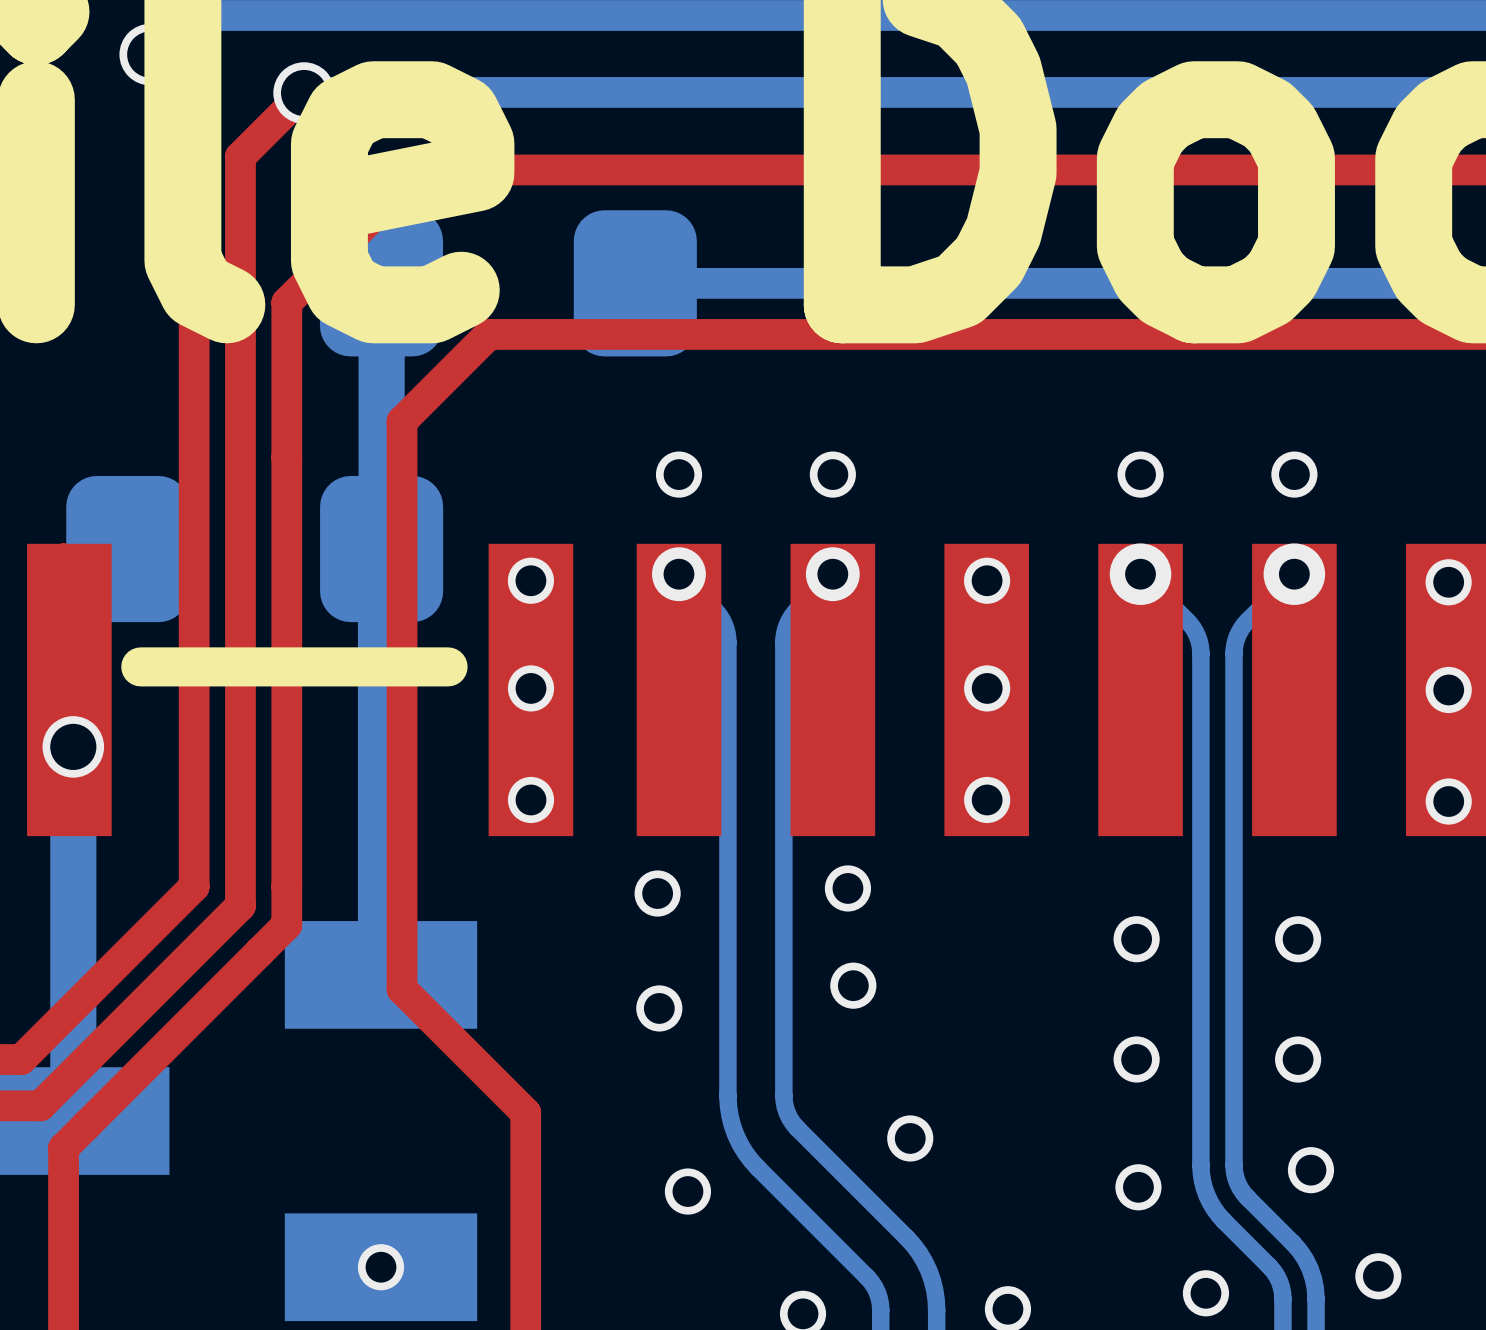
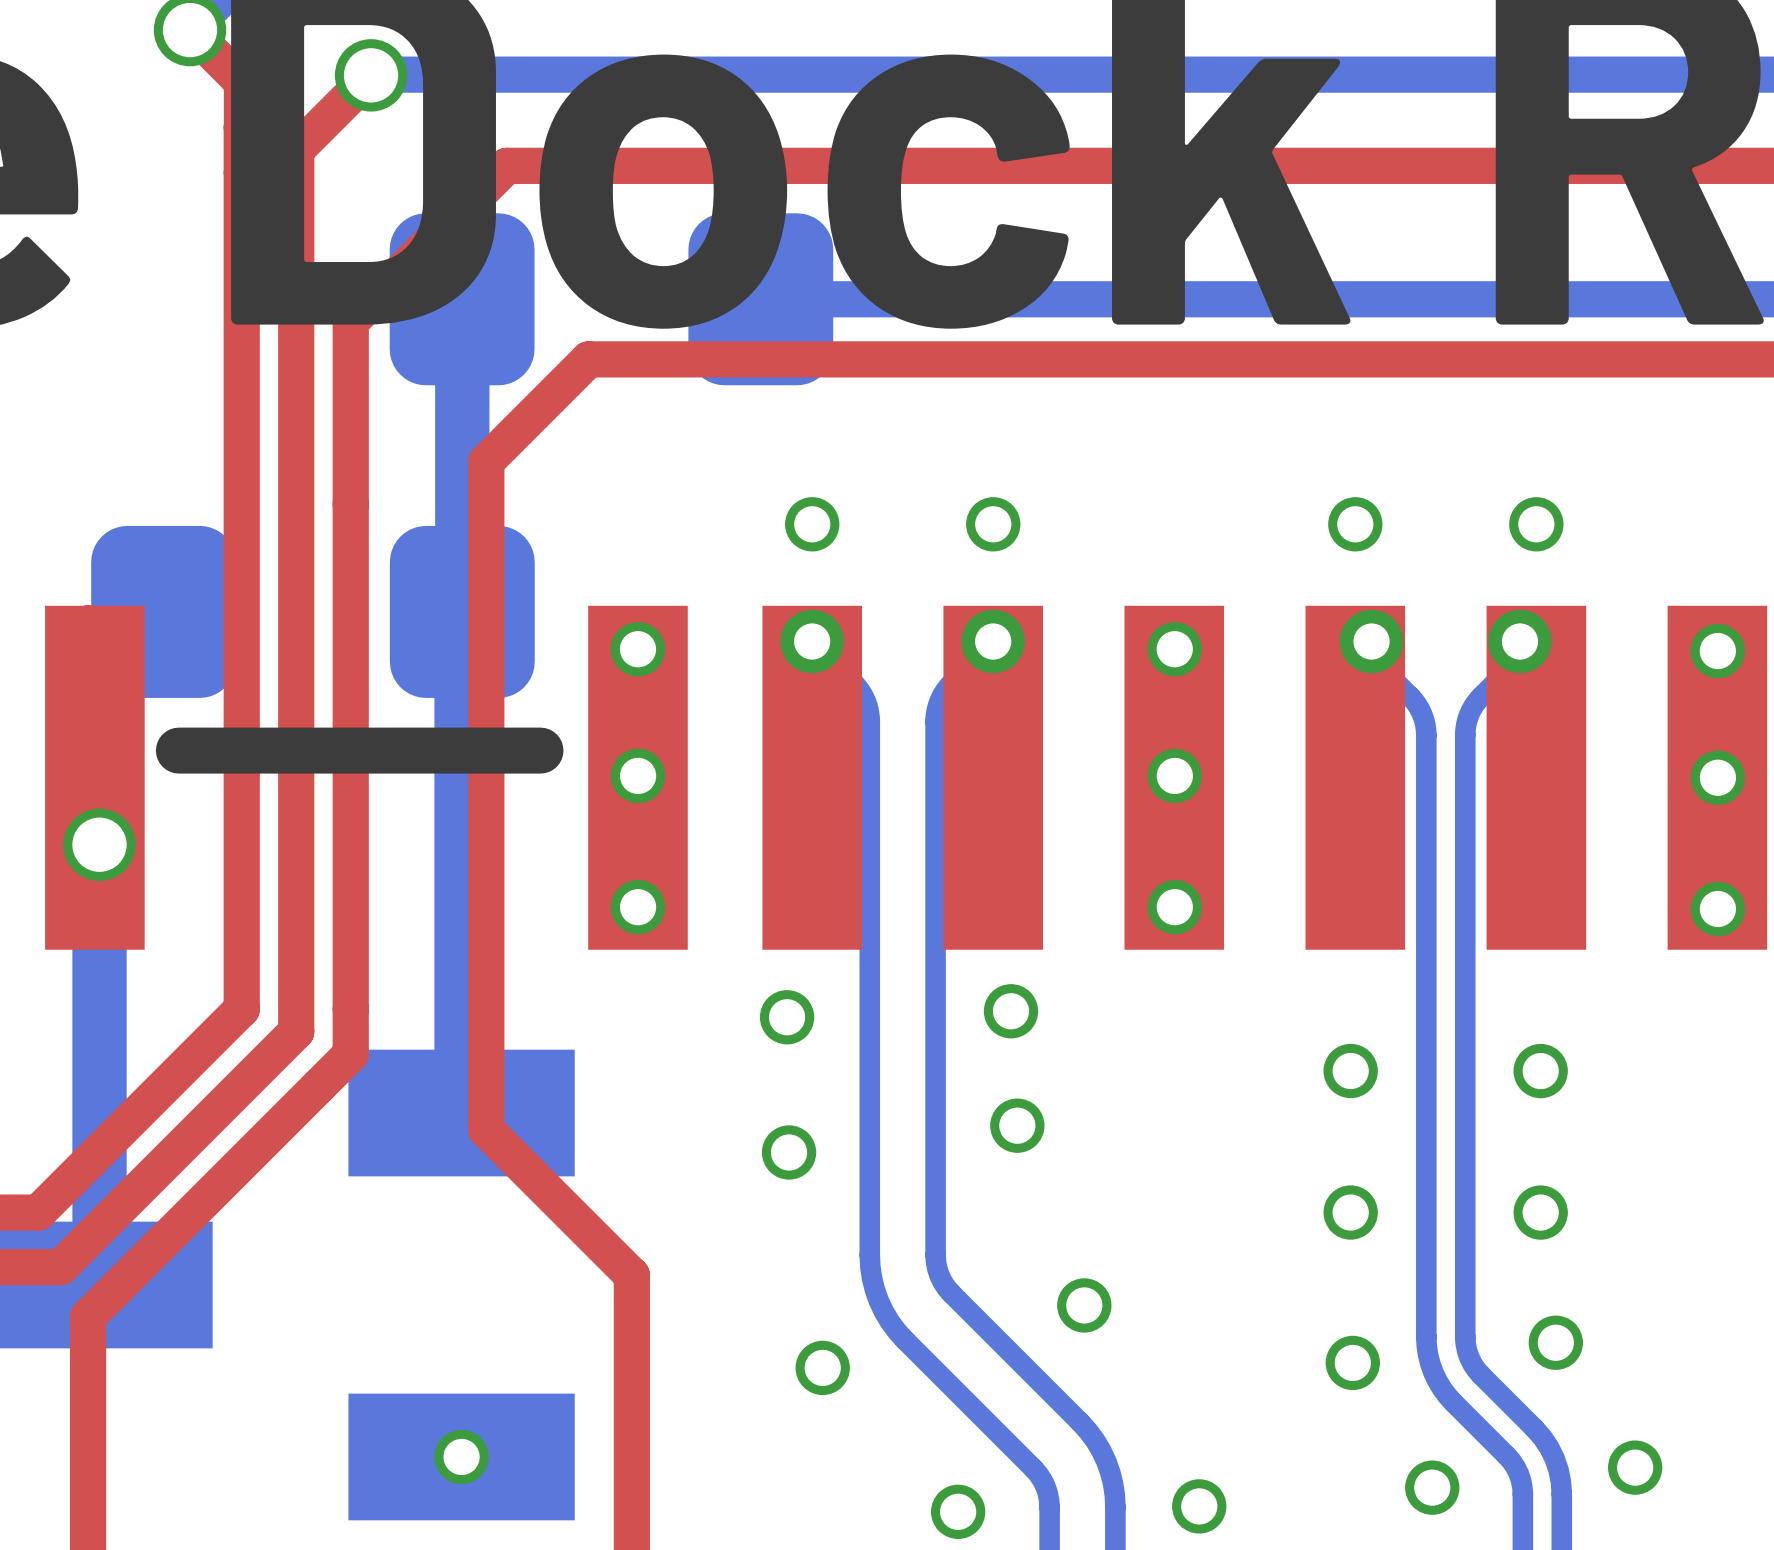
via size: [1109, 543, 1172, 605] -> [1339, 609, 1404, 674]
via size: [1263, 543, 1326, 605] -> [1488, 609, 1552, 674]

